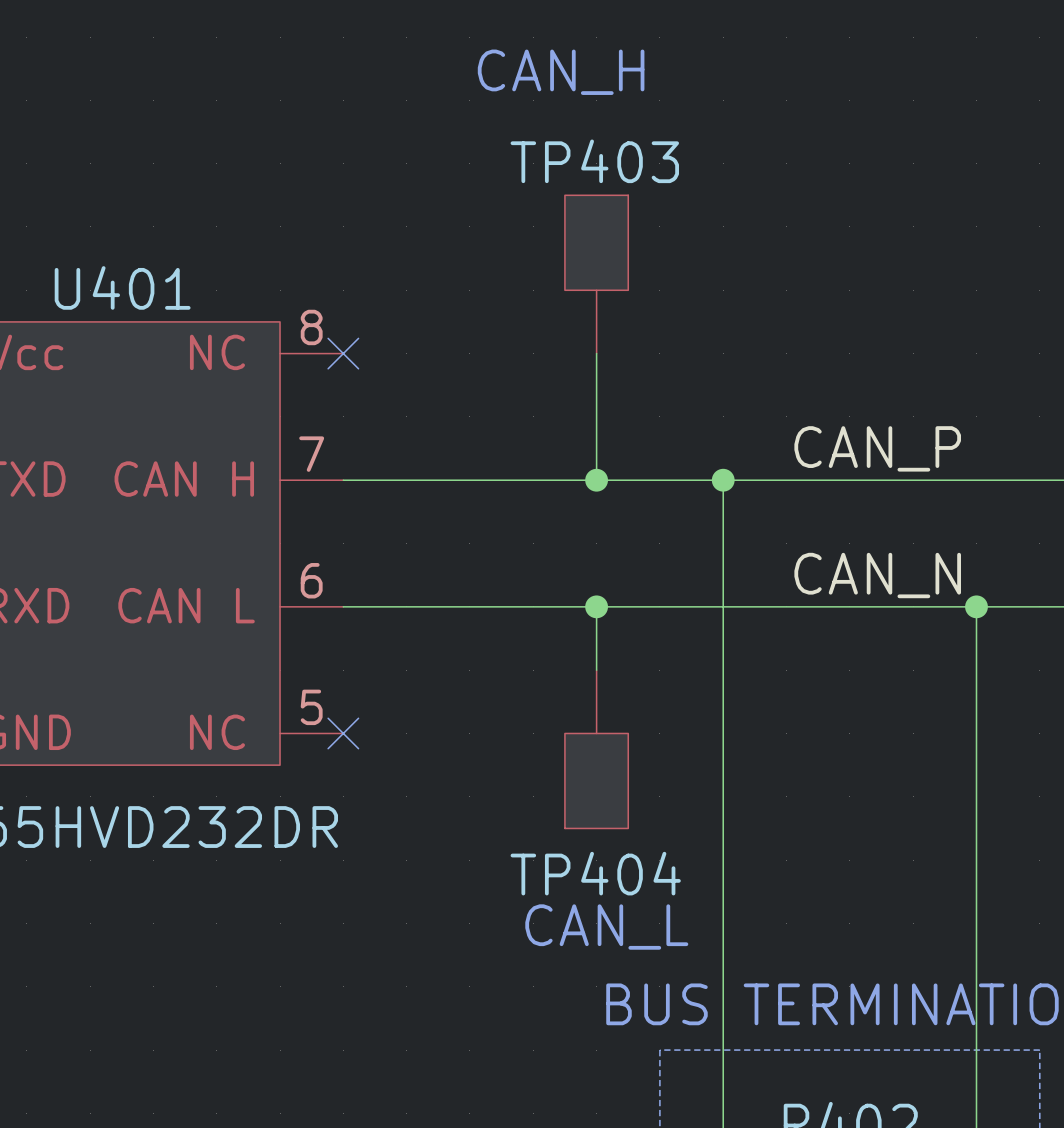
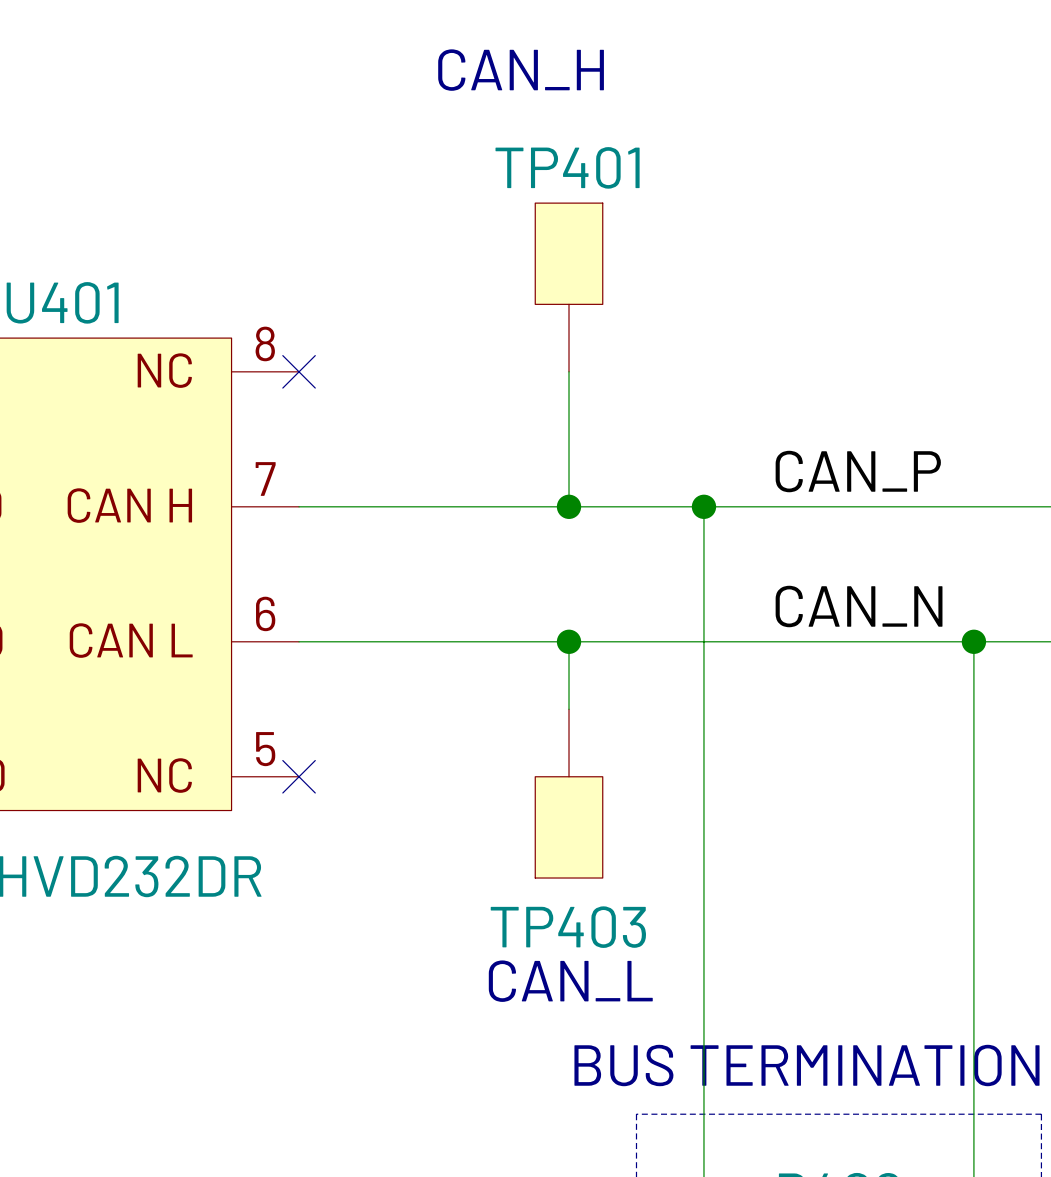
TP403 name: TP403 (594, 161) -> TP401 (567, 167)
TP404 name: TP404 (595, 873) -> TP403 (568, 927)

